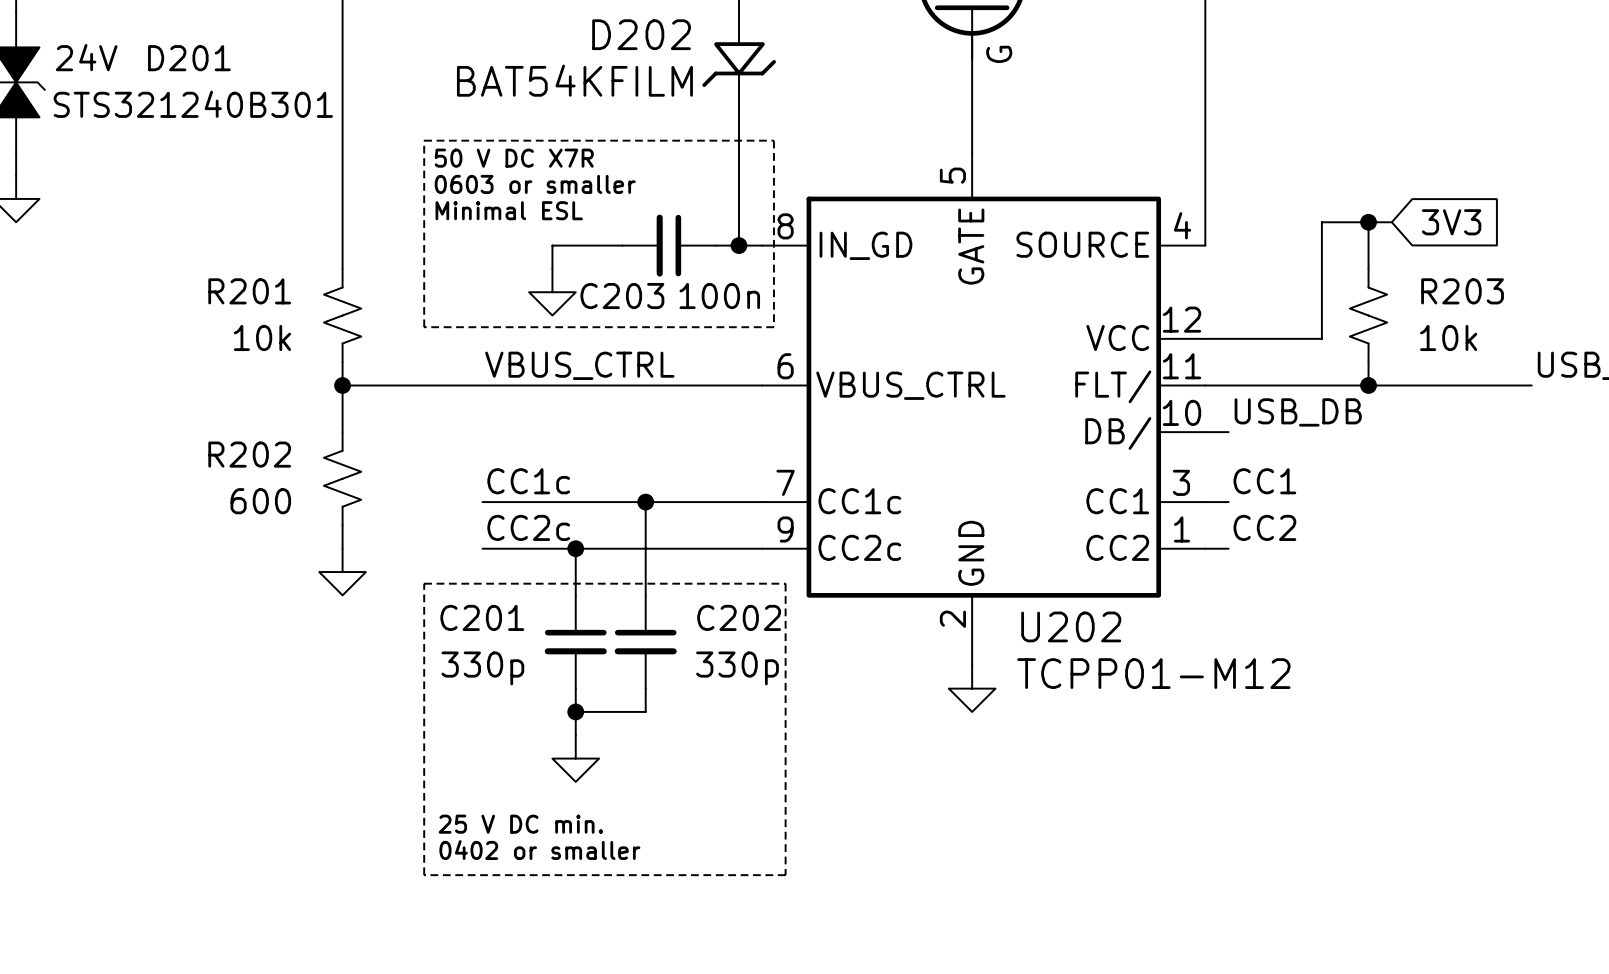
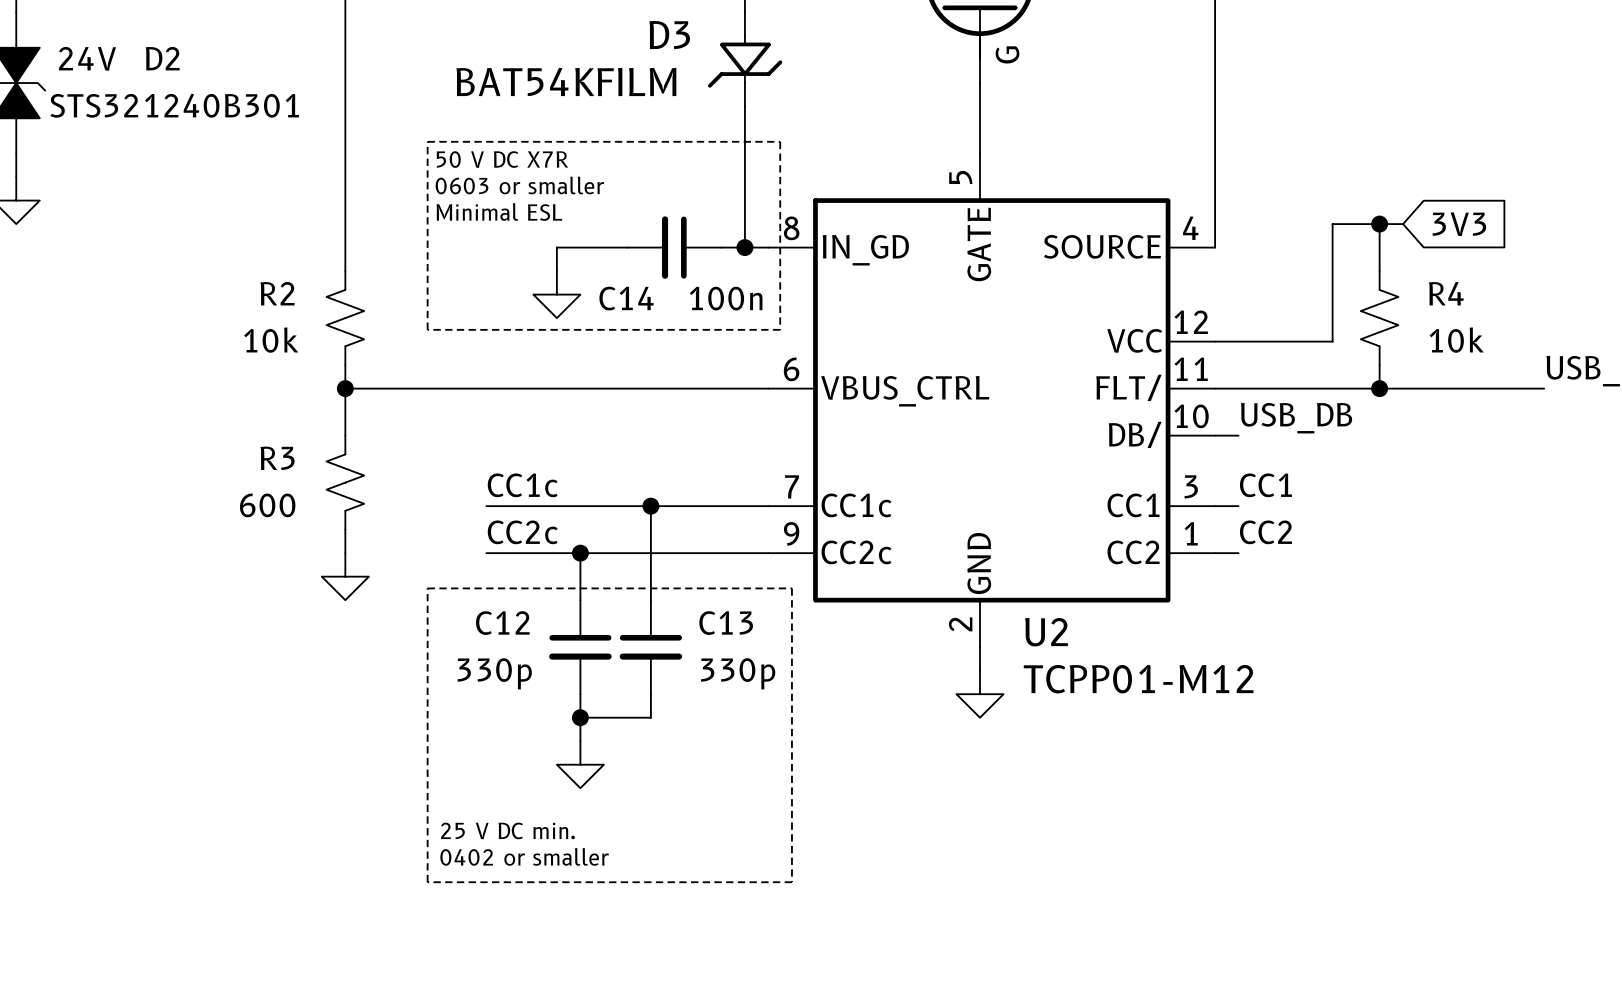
D202 name: D202 (641, 34) -> D3 (669, 35)
D201 name: D201 (189, 58) -> D2 (162, 58)
R201 name: R201 (249, 291) -> R2 (277, 293)
R203 name: R203 (1462, 291) -> R4 (1446, 293)
C203 name: C203 (622, 296) -> C14 (626, 298)
label: VBUS_CTRL (579, 365) -> none
R202 name: R202 (249, 454) -> R3 (277, 458)
C201 name: C201 (482, 617) -> C12 (502, 623)
C202 name: C202 (739, 617) -> C13 (726, 623)
U202 name: U202 (1071, 626) -> U2 (1046, 632)

